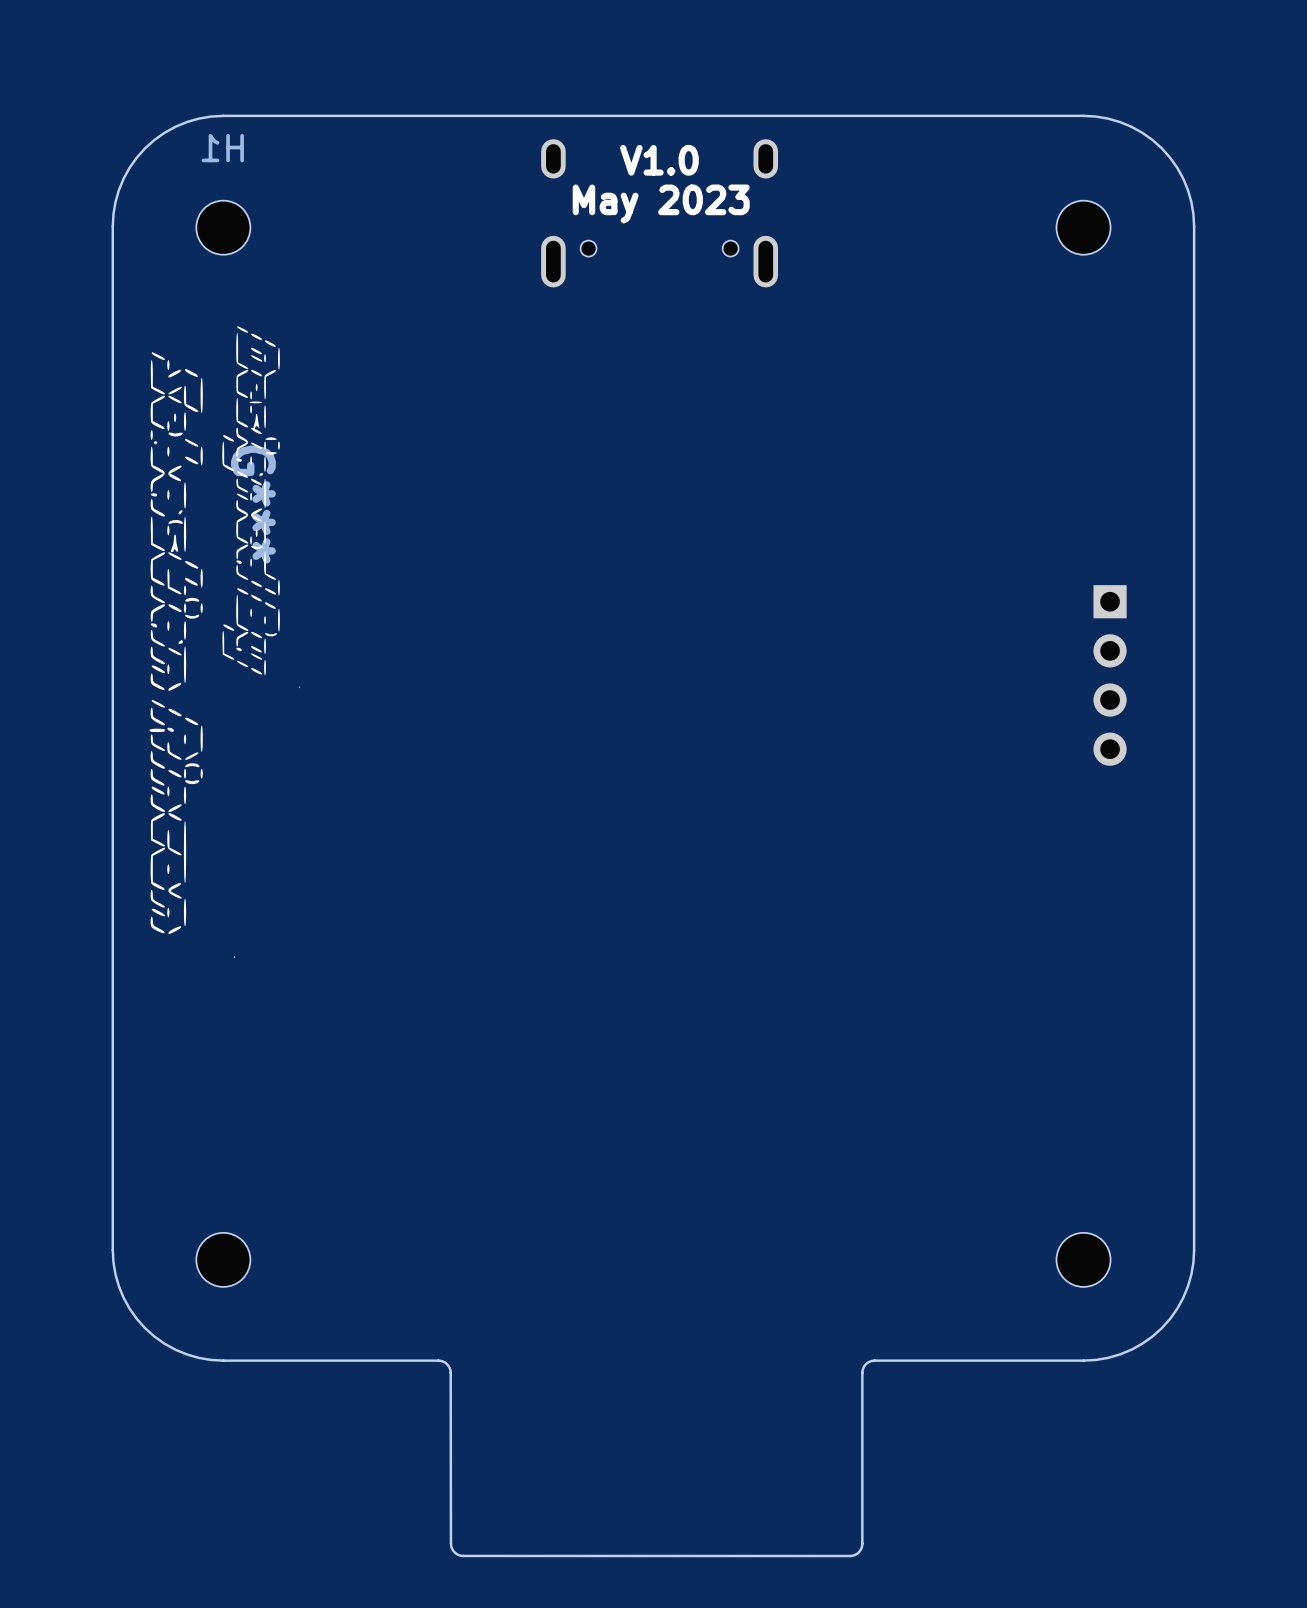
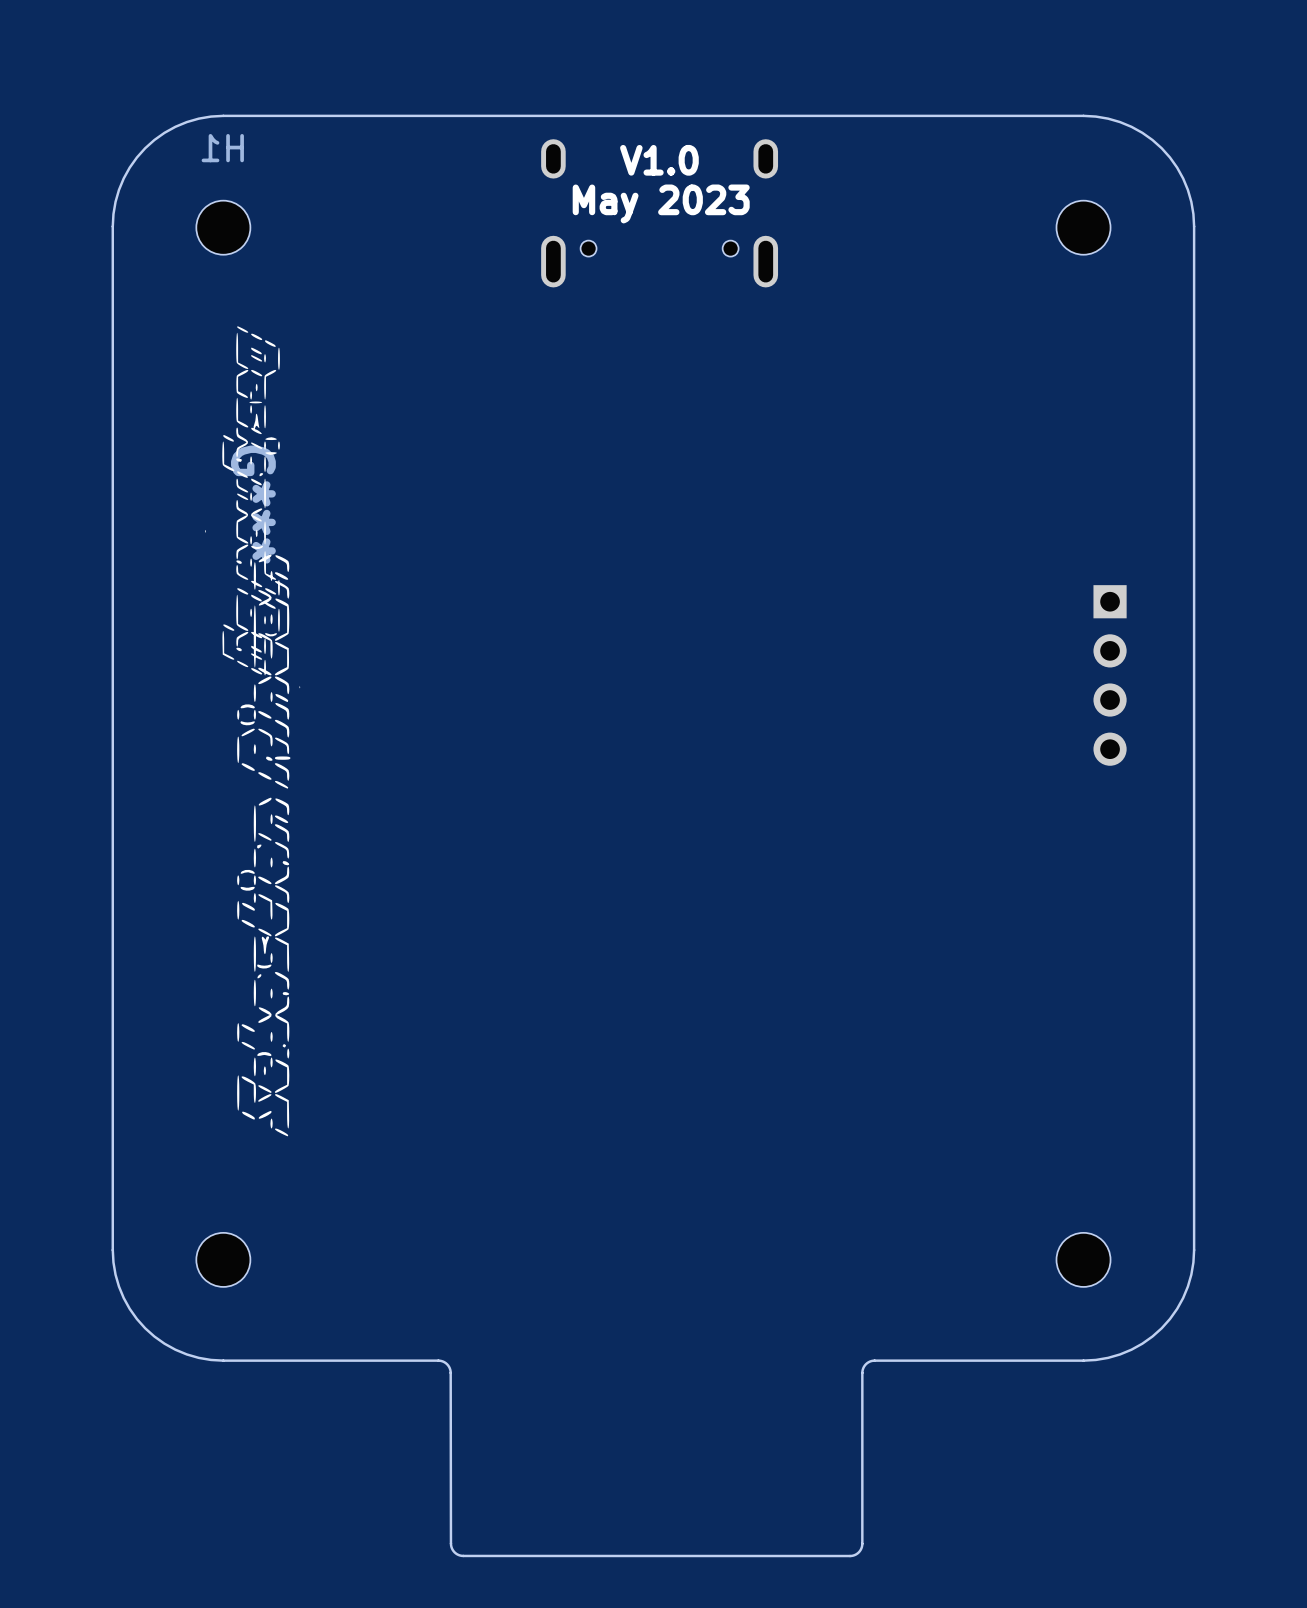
drawing: [149, 352, 235, 959] -> none
drawing: none -> [205, 530, 291, 1137]

